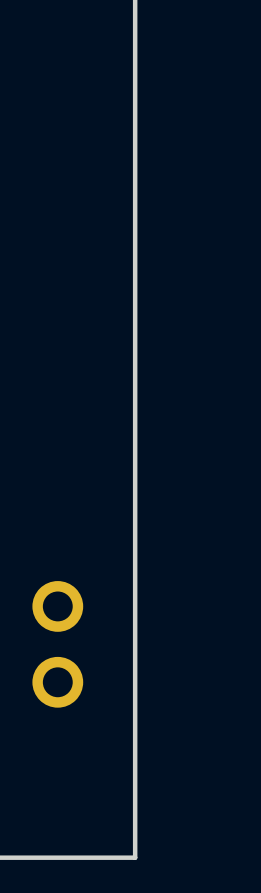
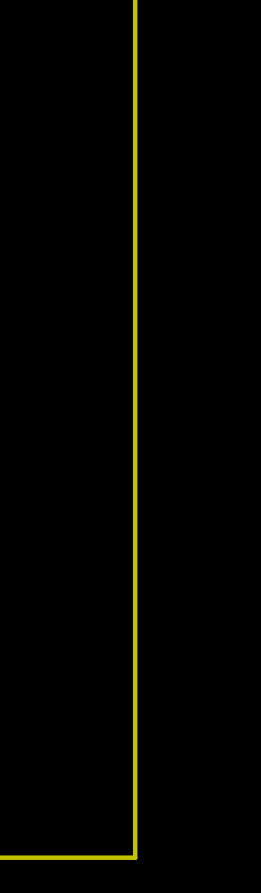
part: (57, 644) -> none

